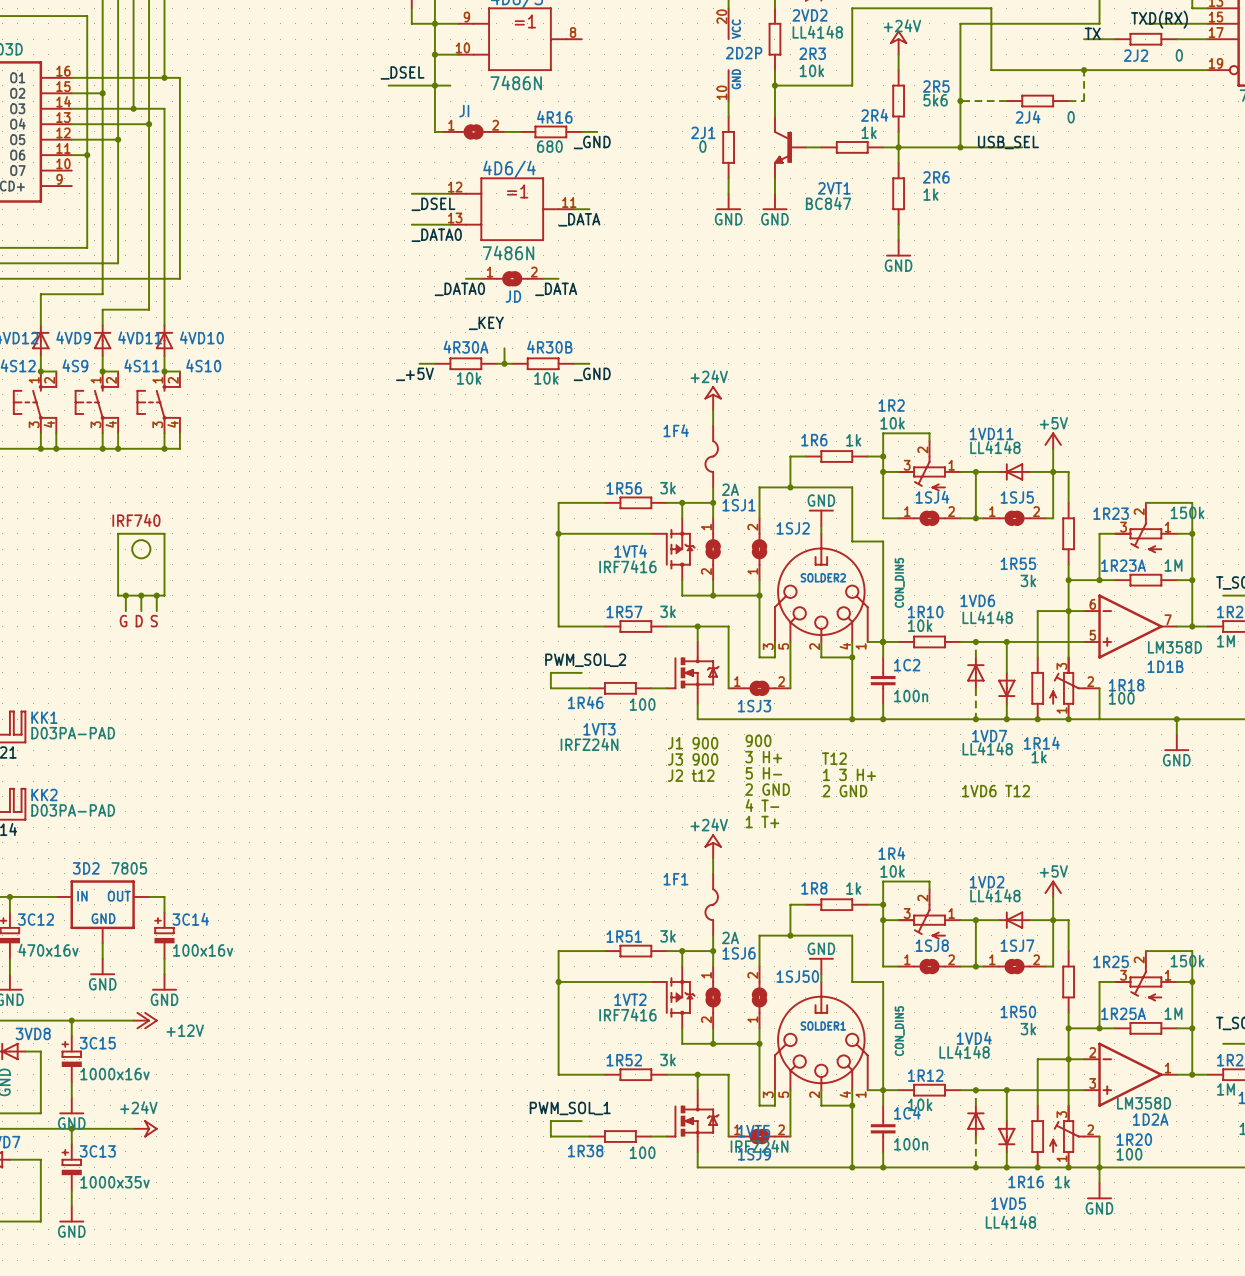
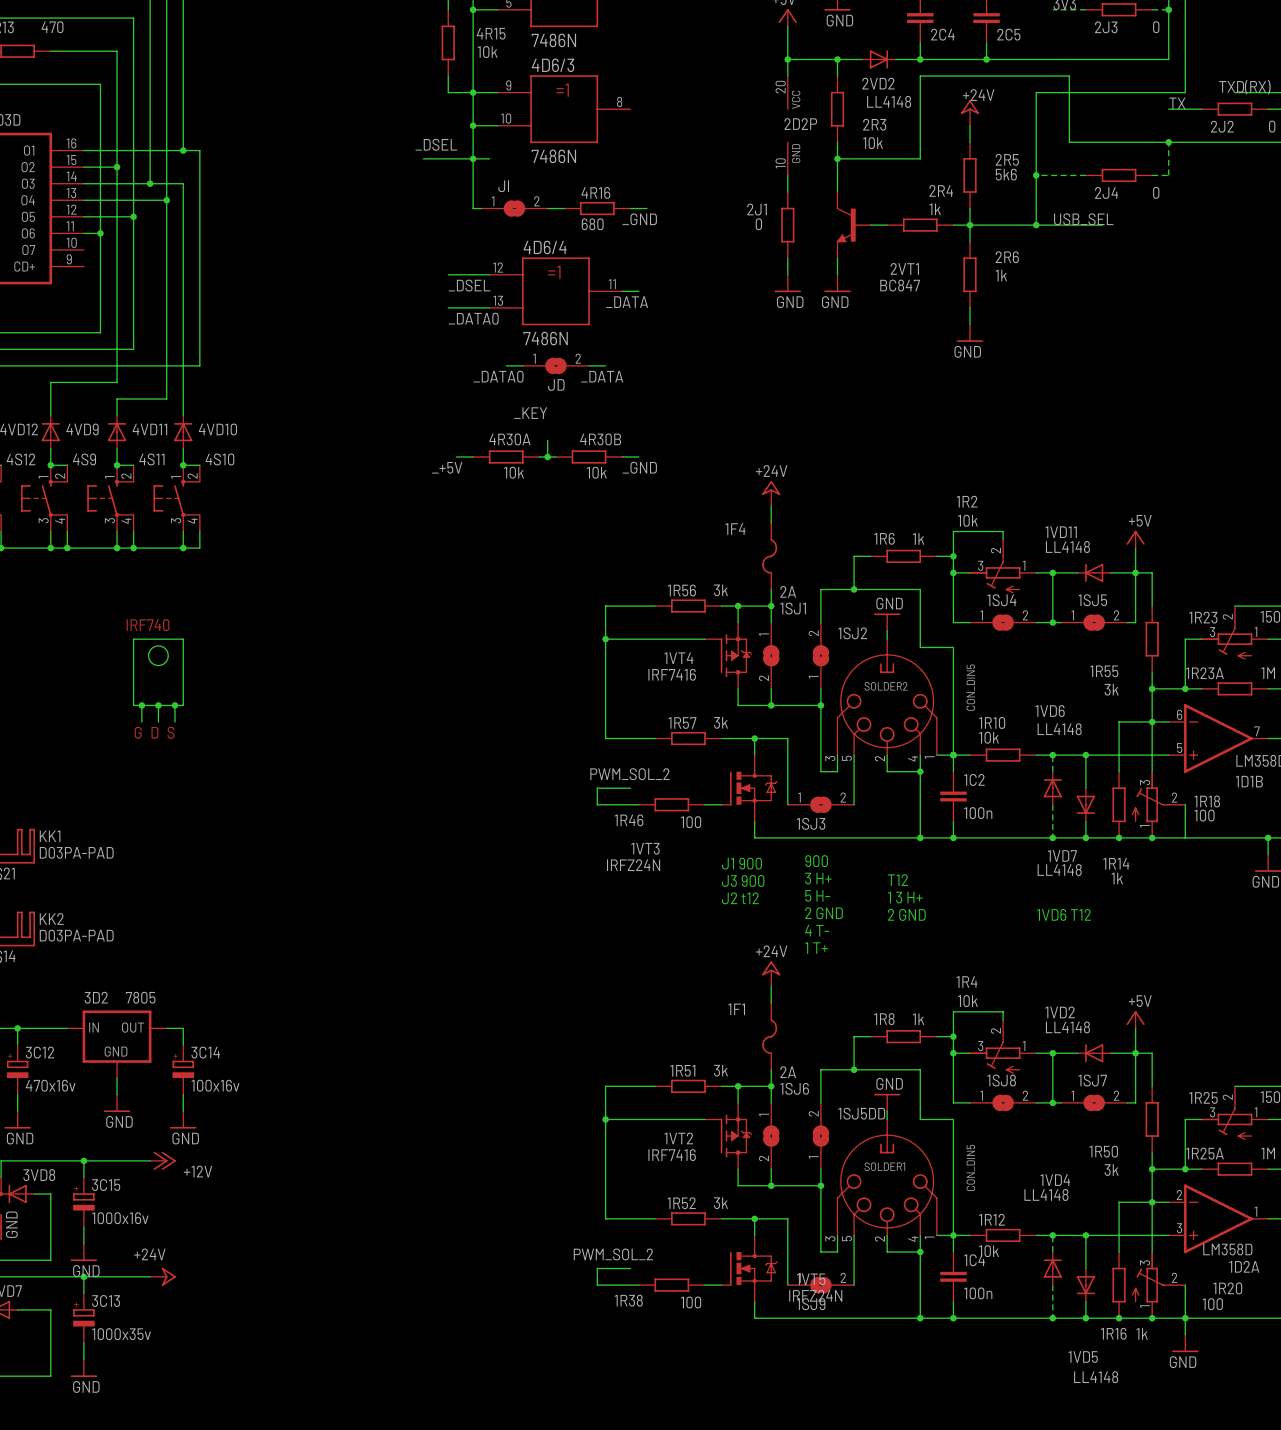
1SJ50 name: 1SJ50 (797, 976) -> 1SJ5DD (861, 1113)
label: PWM_SOL_1 (570, 1108) -> PWM_SOL_2 (613, 1254)

